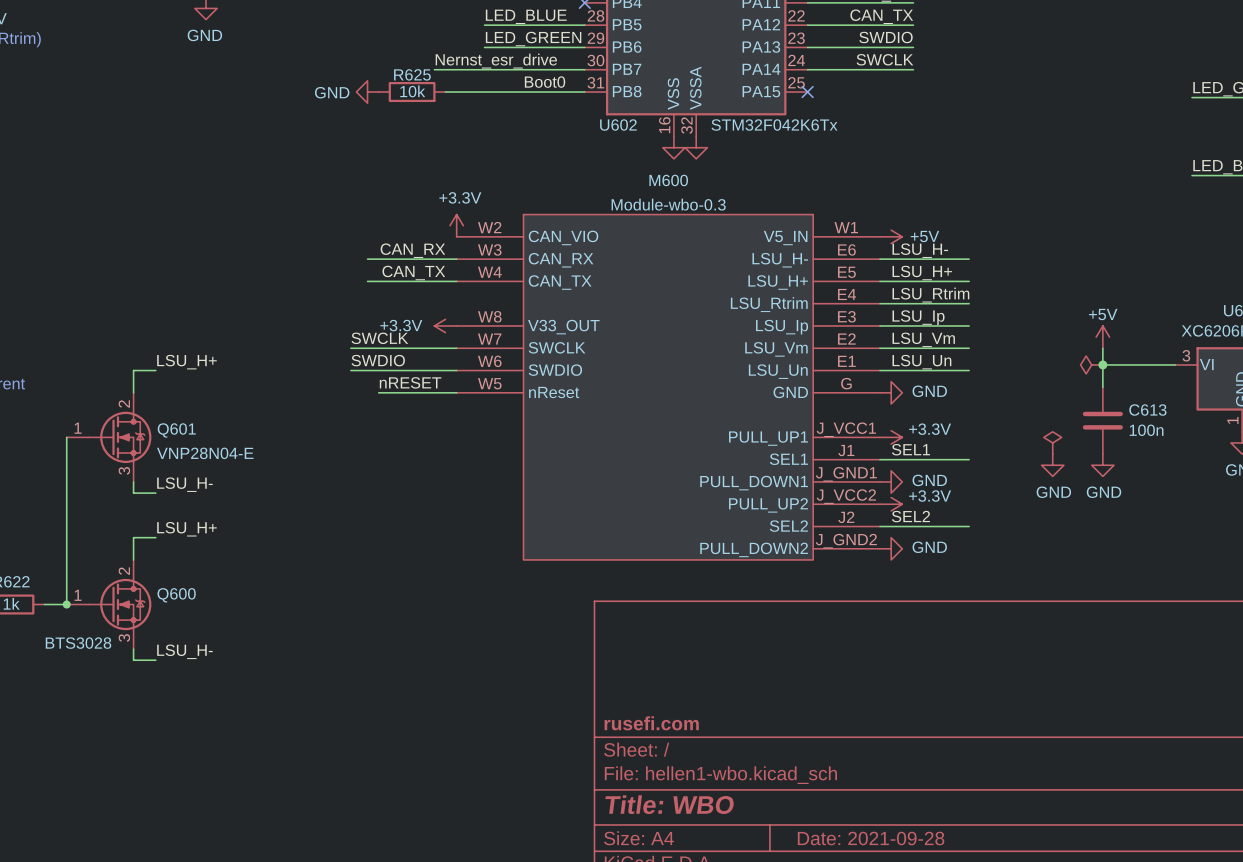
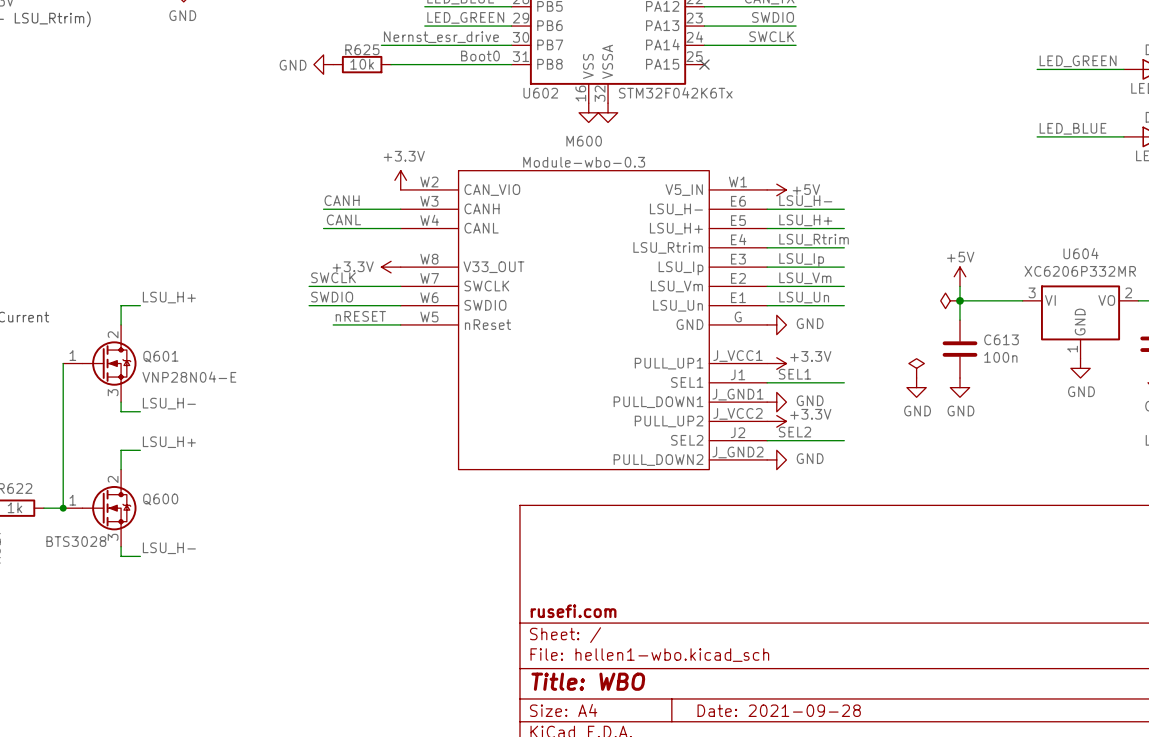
label: none -> CANH (342, 200)
label: CAN_RX (412, 250) -> none
M600 pin name: CAN_RX (561, 260) -> CANH (482, 208)
label: none -> CANL (343, 219)
label: CAN_TX (413, 273) -> none
M600 pin name: CAN_TX (560, 282) -> CANL (481, 228)

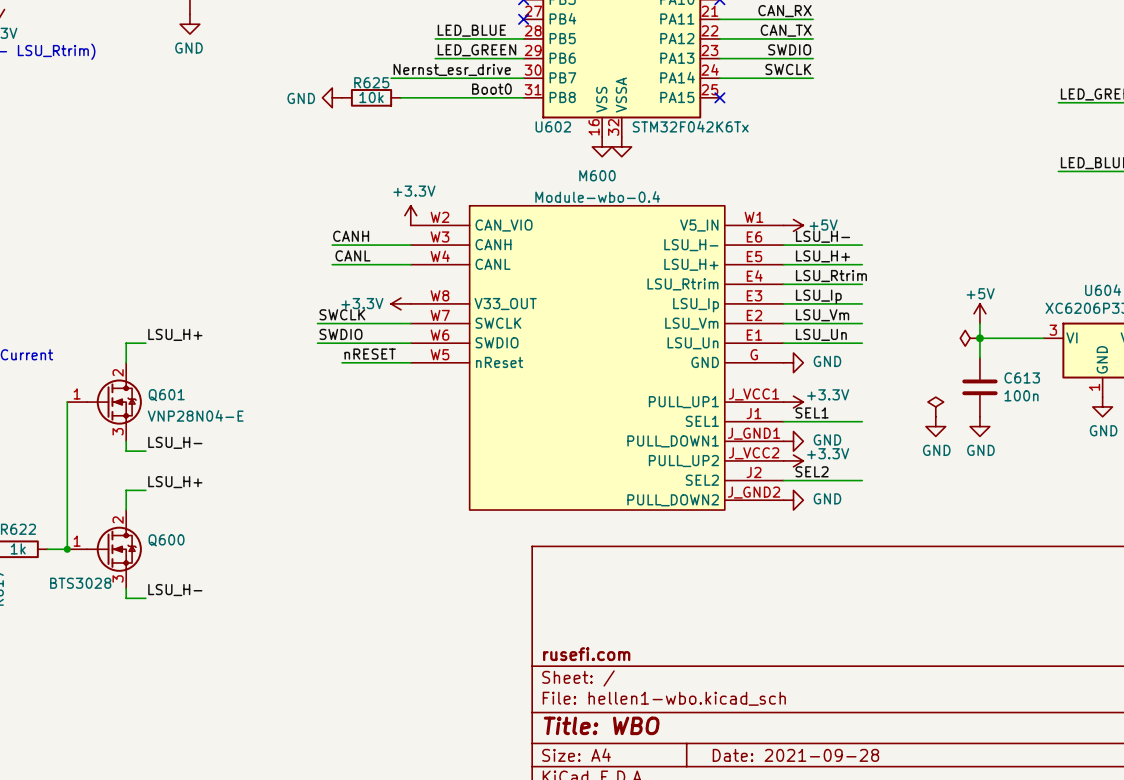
M600 value: Module-wbo-0.3 (584, 162) -> Module-wbo-0.4 (597, 196)

